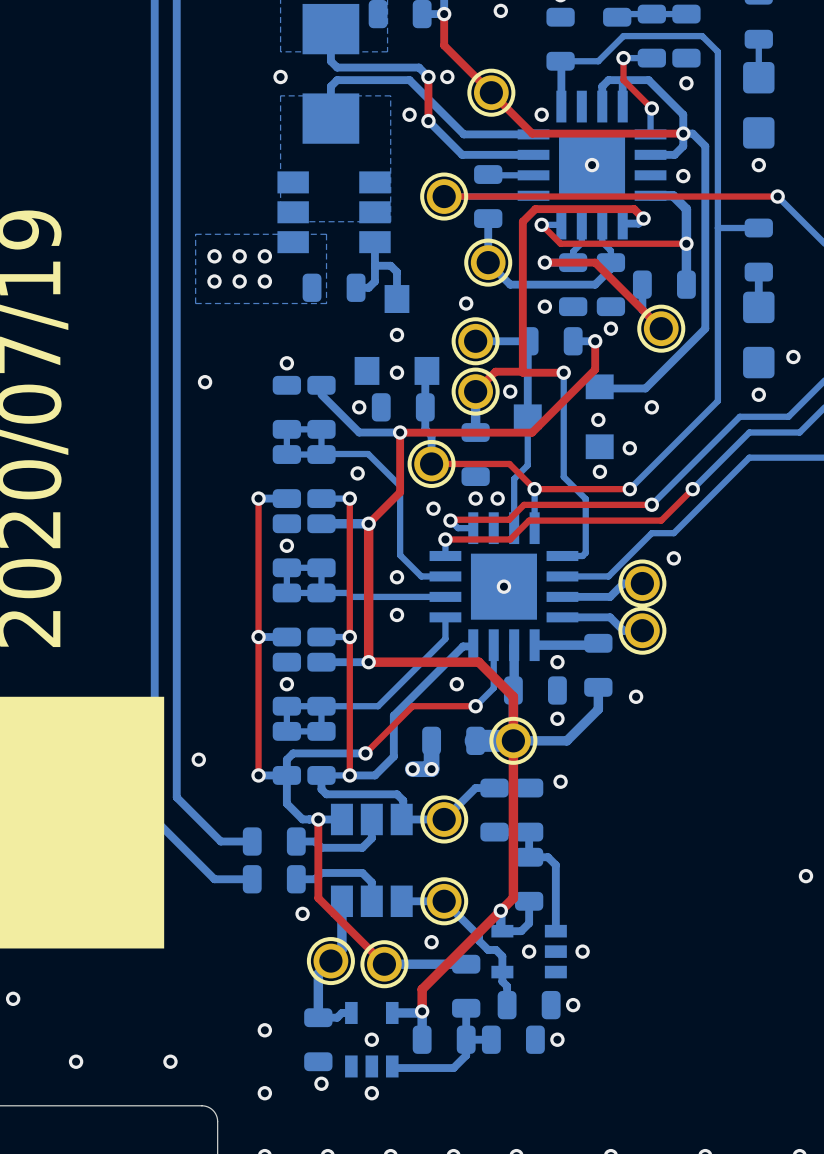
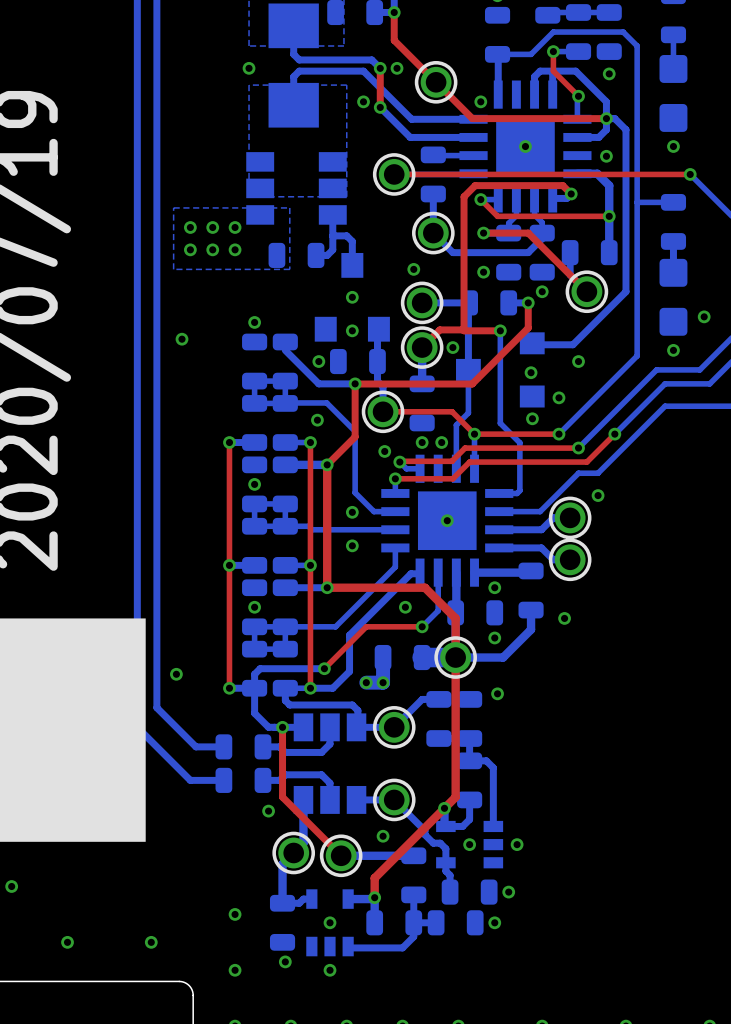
via: (500, 10) -> none
via: (805, 876) -> none

